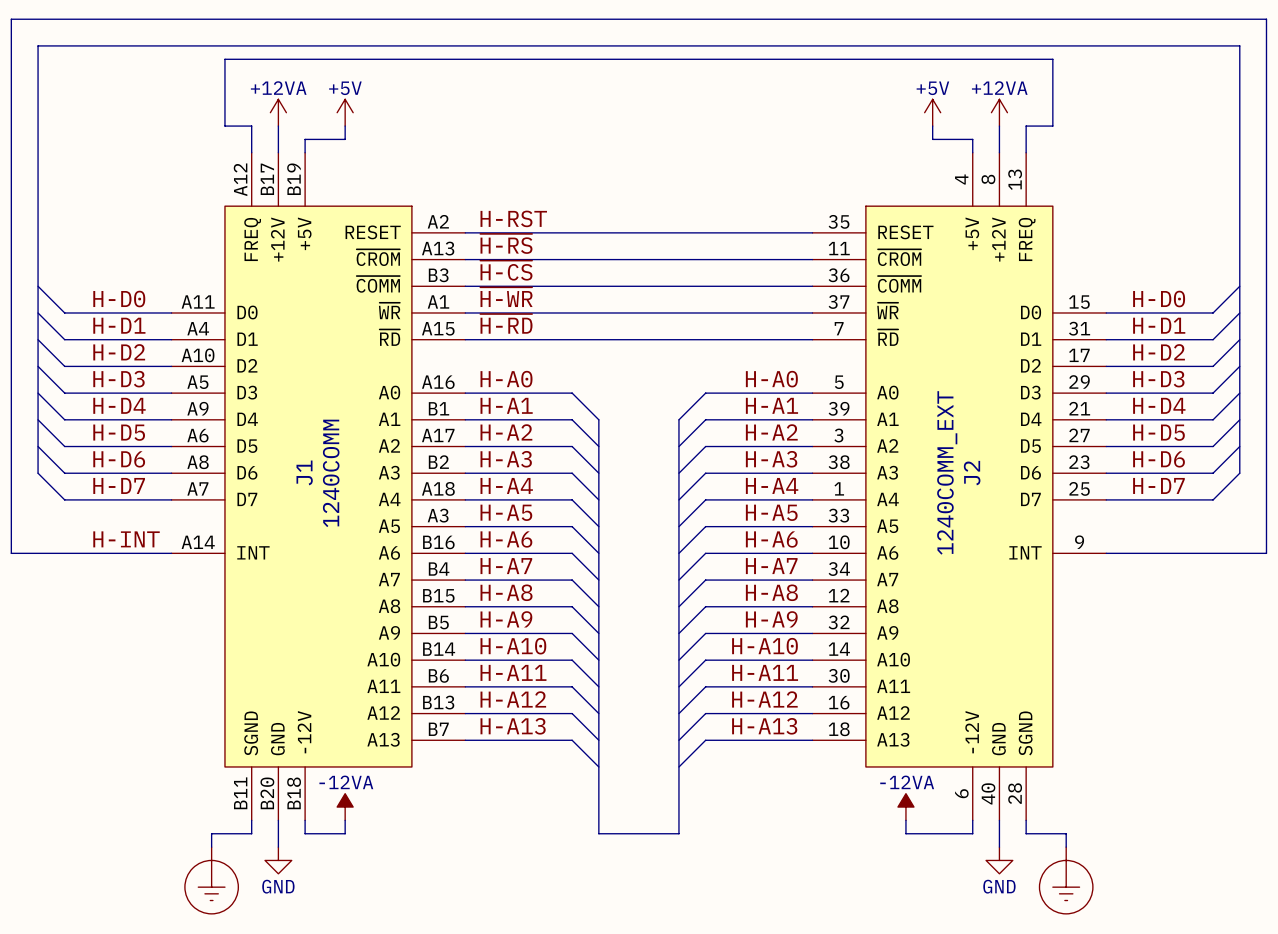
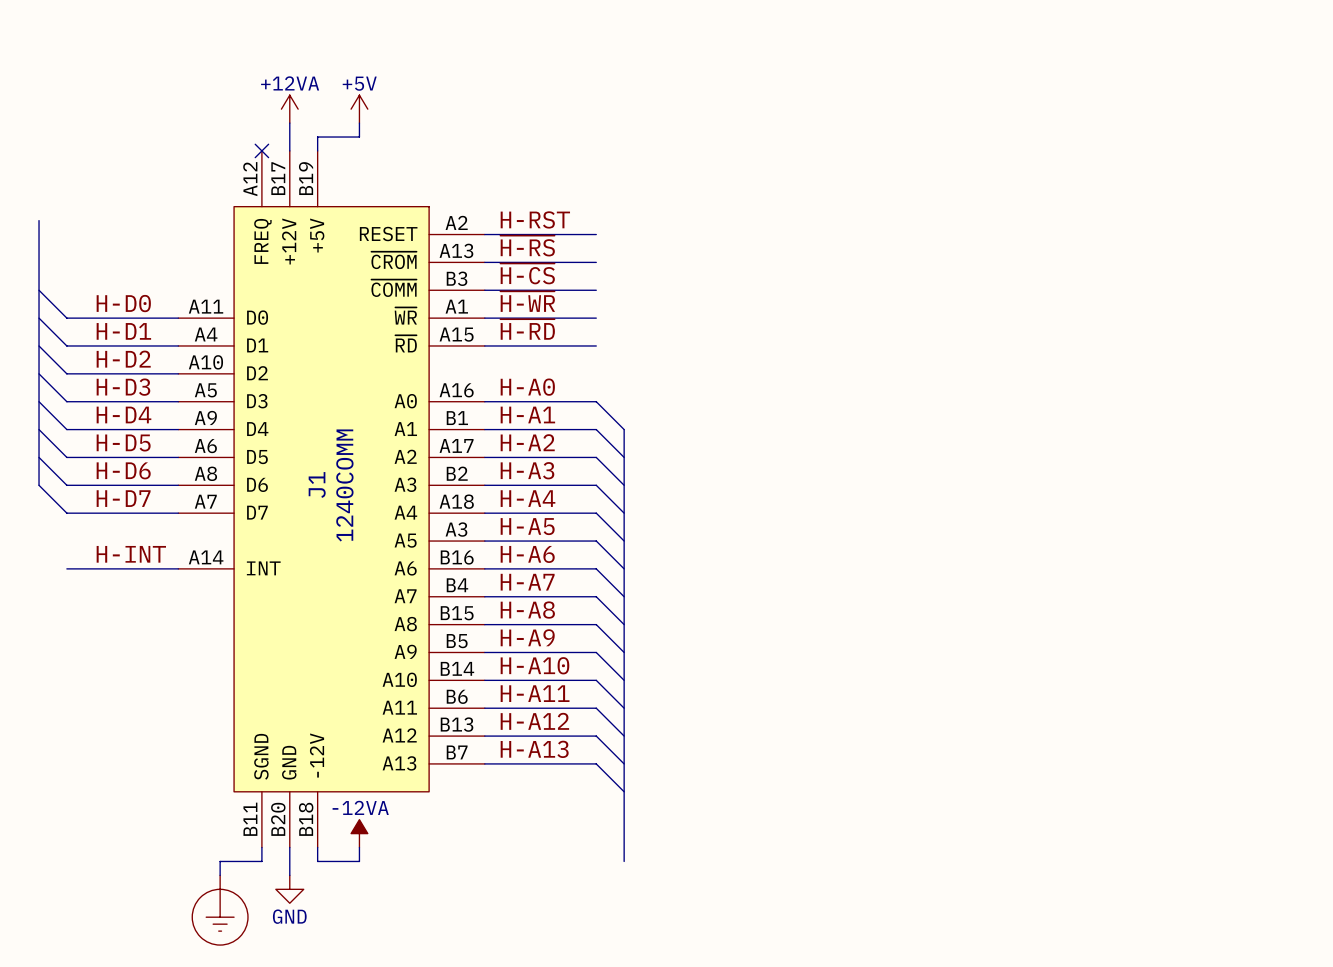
power symbol: +5V (932, 112) -> none
power symbol: +12VA (999, 112) -> none
wire: (932, 126) (932, 139) (972, 139) (972, 152) -> none
wire: (999, 126) (999, 152) -> none
wire: (251, 152) (251, 126) (224, 126) (224, 59) (1052, 59) (1052, 126) (1026, 126) (1026, 152) -> none
no-connect mark: none -> (261, 150)
bus: (38, 219) (38, 45) (1239, 45) (1239, 473) -> none
wire: (572, 232) (812, 232) -> none
wire: (572, 259) (812, 259) -> none
wire: (572, 286) (812, 286) -> none
wire: (1239, 286) (1213, 312) (1106, 312) -> none
label: H-D0 (1159, 299) -> none
wire: (572, 312) (812, 312) -> none
wire: (1239, 312) (1213, 339) (1106, 339) -> none
label: H-D1 (1159, 325) -> none
wire: (572, 339) (812, 339) -> none
wire: (1239, 339) (1213, 366) (1106, 366) -> none
label: H-D2 (1159, 352) -> none
wire: (1239, 366) (1213, 393) (1106, 393) -> none
label: H-A0 (771, 379) -> none
label: H-D3 (1158, 379) -> none
wire: (812, 393) (705, 393) (678, 419) -> none
wire: (1239, 393) (1213, 419) (1106, 419) -> none
label: H-A1 (771, 405) -> none
label: H-D4 (1159, 405) -> none
bus: (678, 419) (678, 833) (598, 833) -> none
wire: (812, 419) (705, 419) (678, 446) -> none
wire: (1239, 419) (1213, 446) (1106, 446) -> none
label: H-A2 (771, 432) -> none
label: H-D5 (1158, 432) -> none
wire: (812, 446) (705, 446) (678, 473) -> none
wire: (1239, 446) (1213, 473) (1106, 473) -> none
label: H-A3 (771, 459) -> none
label: H-D6 (1159, 459) -> none
wire: (812, 473) (705, 473) (678, 499) -> none
wire: (1239, 473) (1213, 499) (1106, 499) -> none
label: H-A4 (772, 485) -> none
label: H-D7 (1158, 485) -> none
J2: 1240COMM_EXT (959, 486) -> none
wire: (812, 499) (705, 499) (678, 526) -> none
label: H-A5 (771, 512) -> none
wire: (812, 526) (705, 526) (678, 553) -> none
label: H-A6 (771, 539) -> none
wire: (64, 553) (11, 553) (11, 19) (1266, 19) (1266, 553) (1106, 553) -> none
wire: (812, 553) (705, 553) (678, 580) -> none
label: H-A7 (771, 566) -> none
wire: (812, 580) (705, 580) (678, 606) -> none
label: H-A8 (771, 592) -> none
wire: (812, 606) (705, 606) (678, 633) -> none
label: H-A9 (771, 619) -> none
wire: (812, 633) (705, 633) (678, 660) -> none
label: H-A10 (764, 646) -> none
wire: (812, 660) (705, 660) (678, 686) -> none
label: H-A11 (765, 672) -> none
wire: (812, 686) (705, 686) (678, 713) -> none
label: H-A12 (764, 699) -> none
wire: (812, 713) (705, 713) (678, 740) -> none
label: H-A13 (764, 726) -> none
wire: (812, 740) (705, 740) (678, 766) -> none
power symbol: -12VA (905, 807) -> none
wire: (905, 820) (905, 833) (972, 833) (972, 820) -> none
wire: (999, 820) (999, 847) -> none
wire: (1026, 820) (1026, 833) (1066, 833) (1066, 847) -> none
power symbol: GND (999, 860) -> none
power symbol: (1066, 880) -> none

